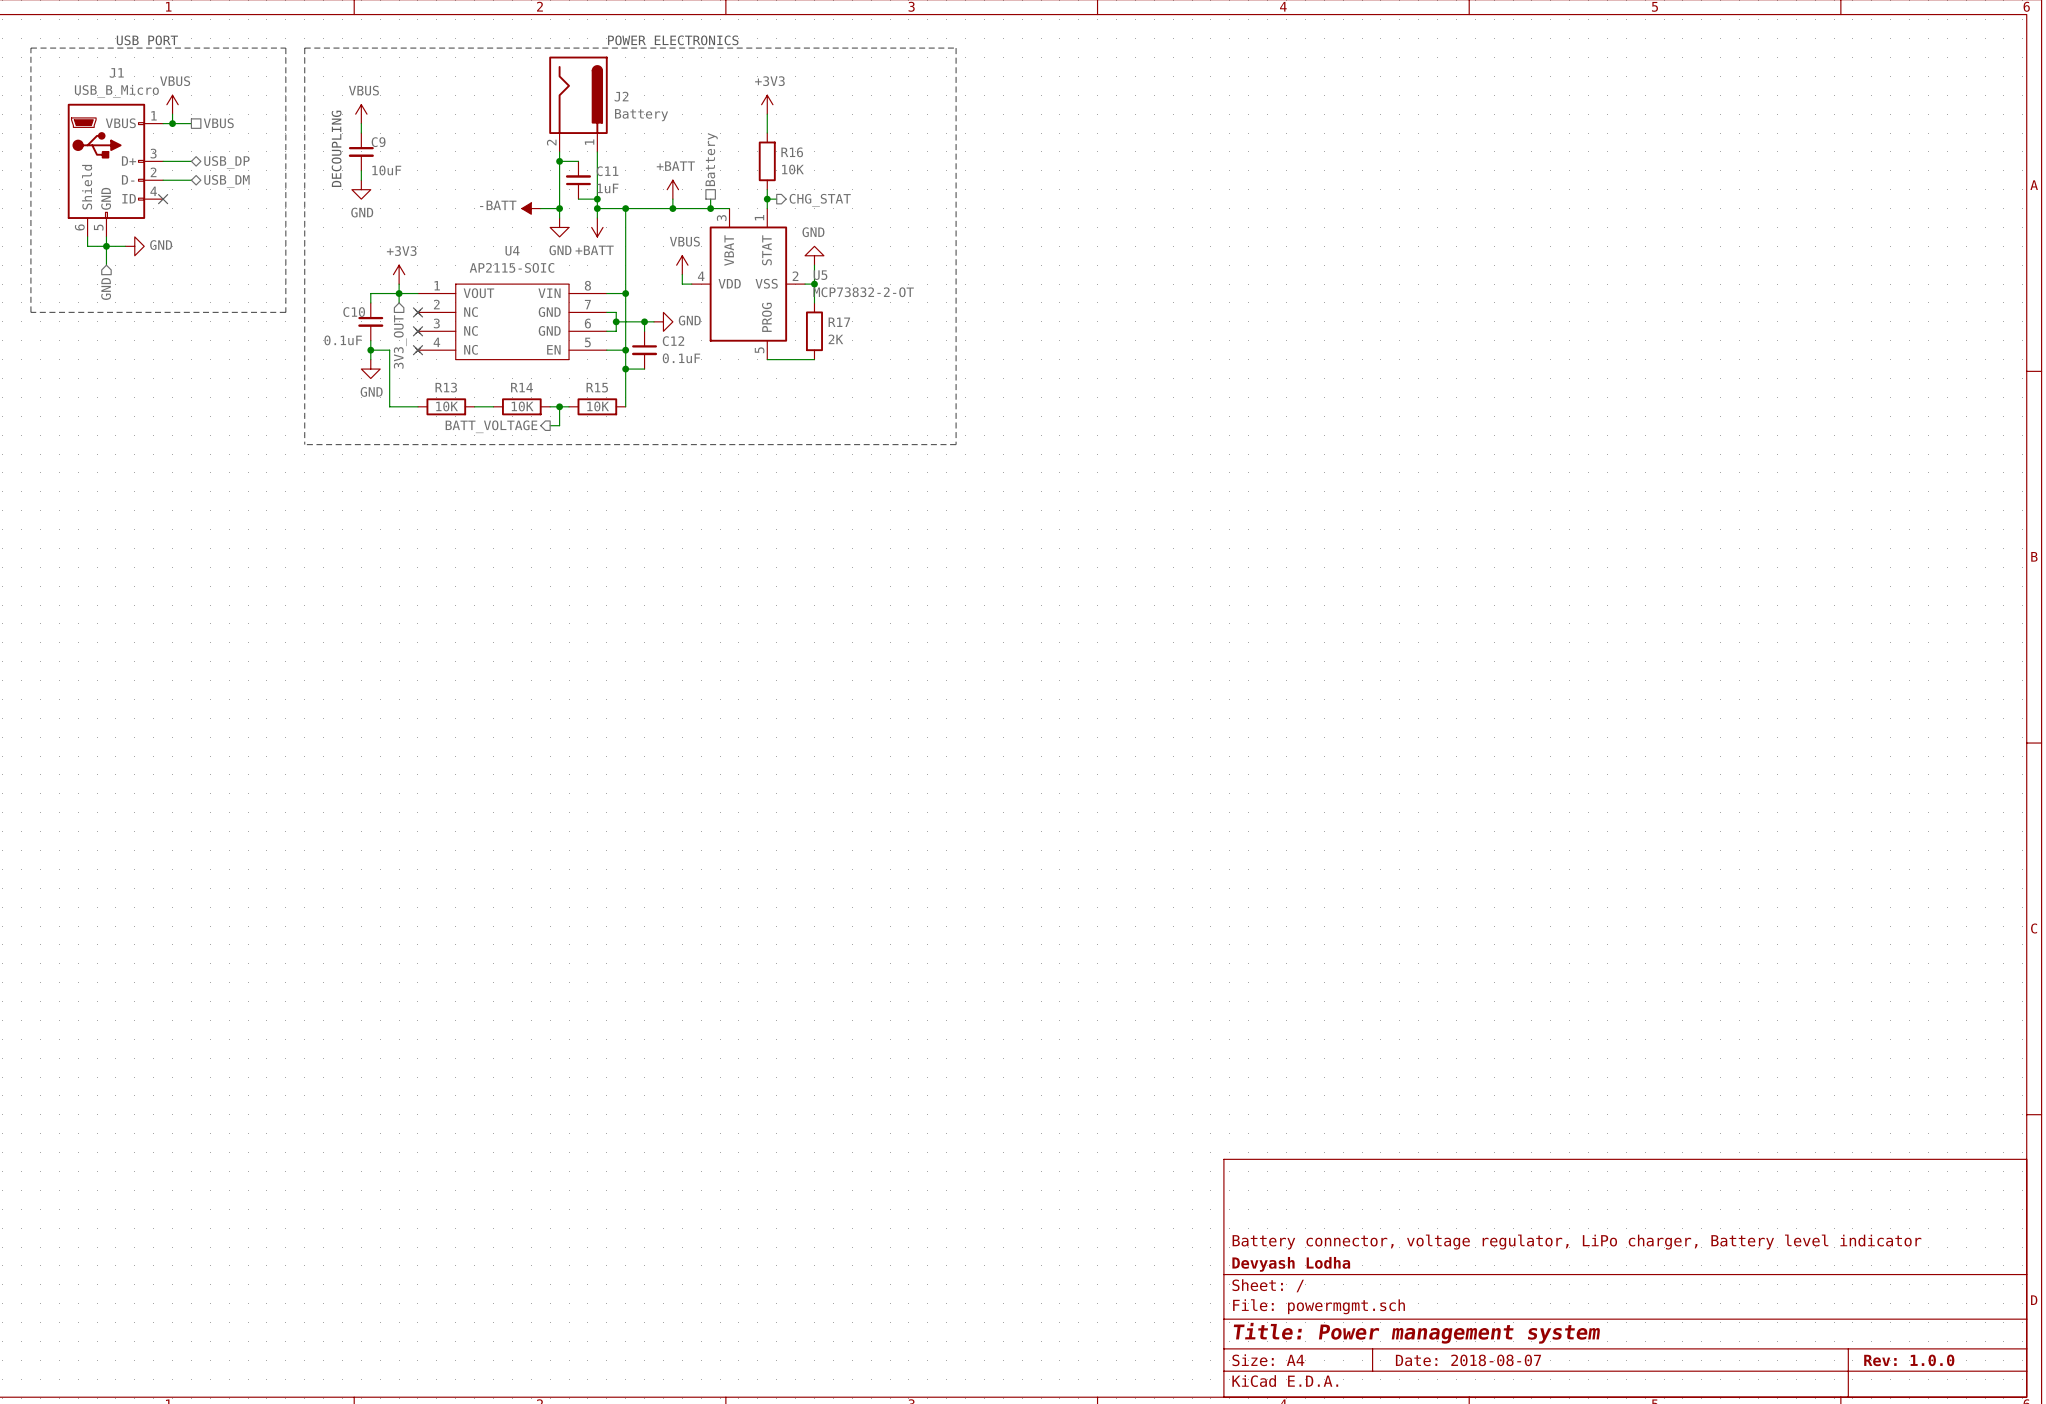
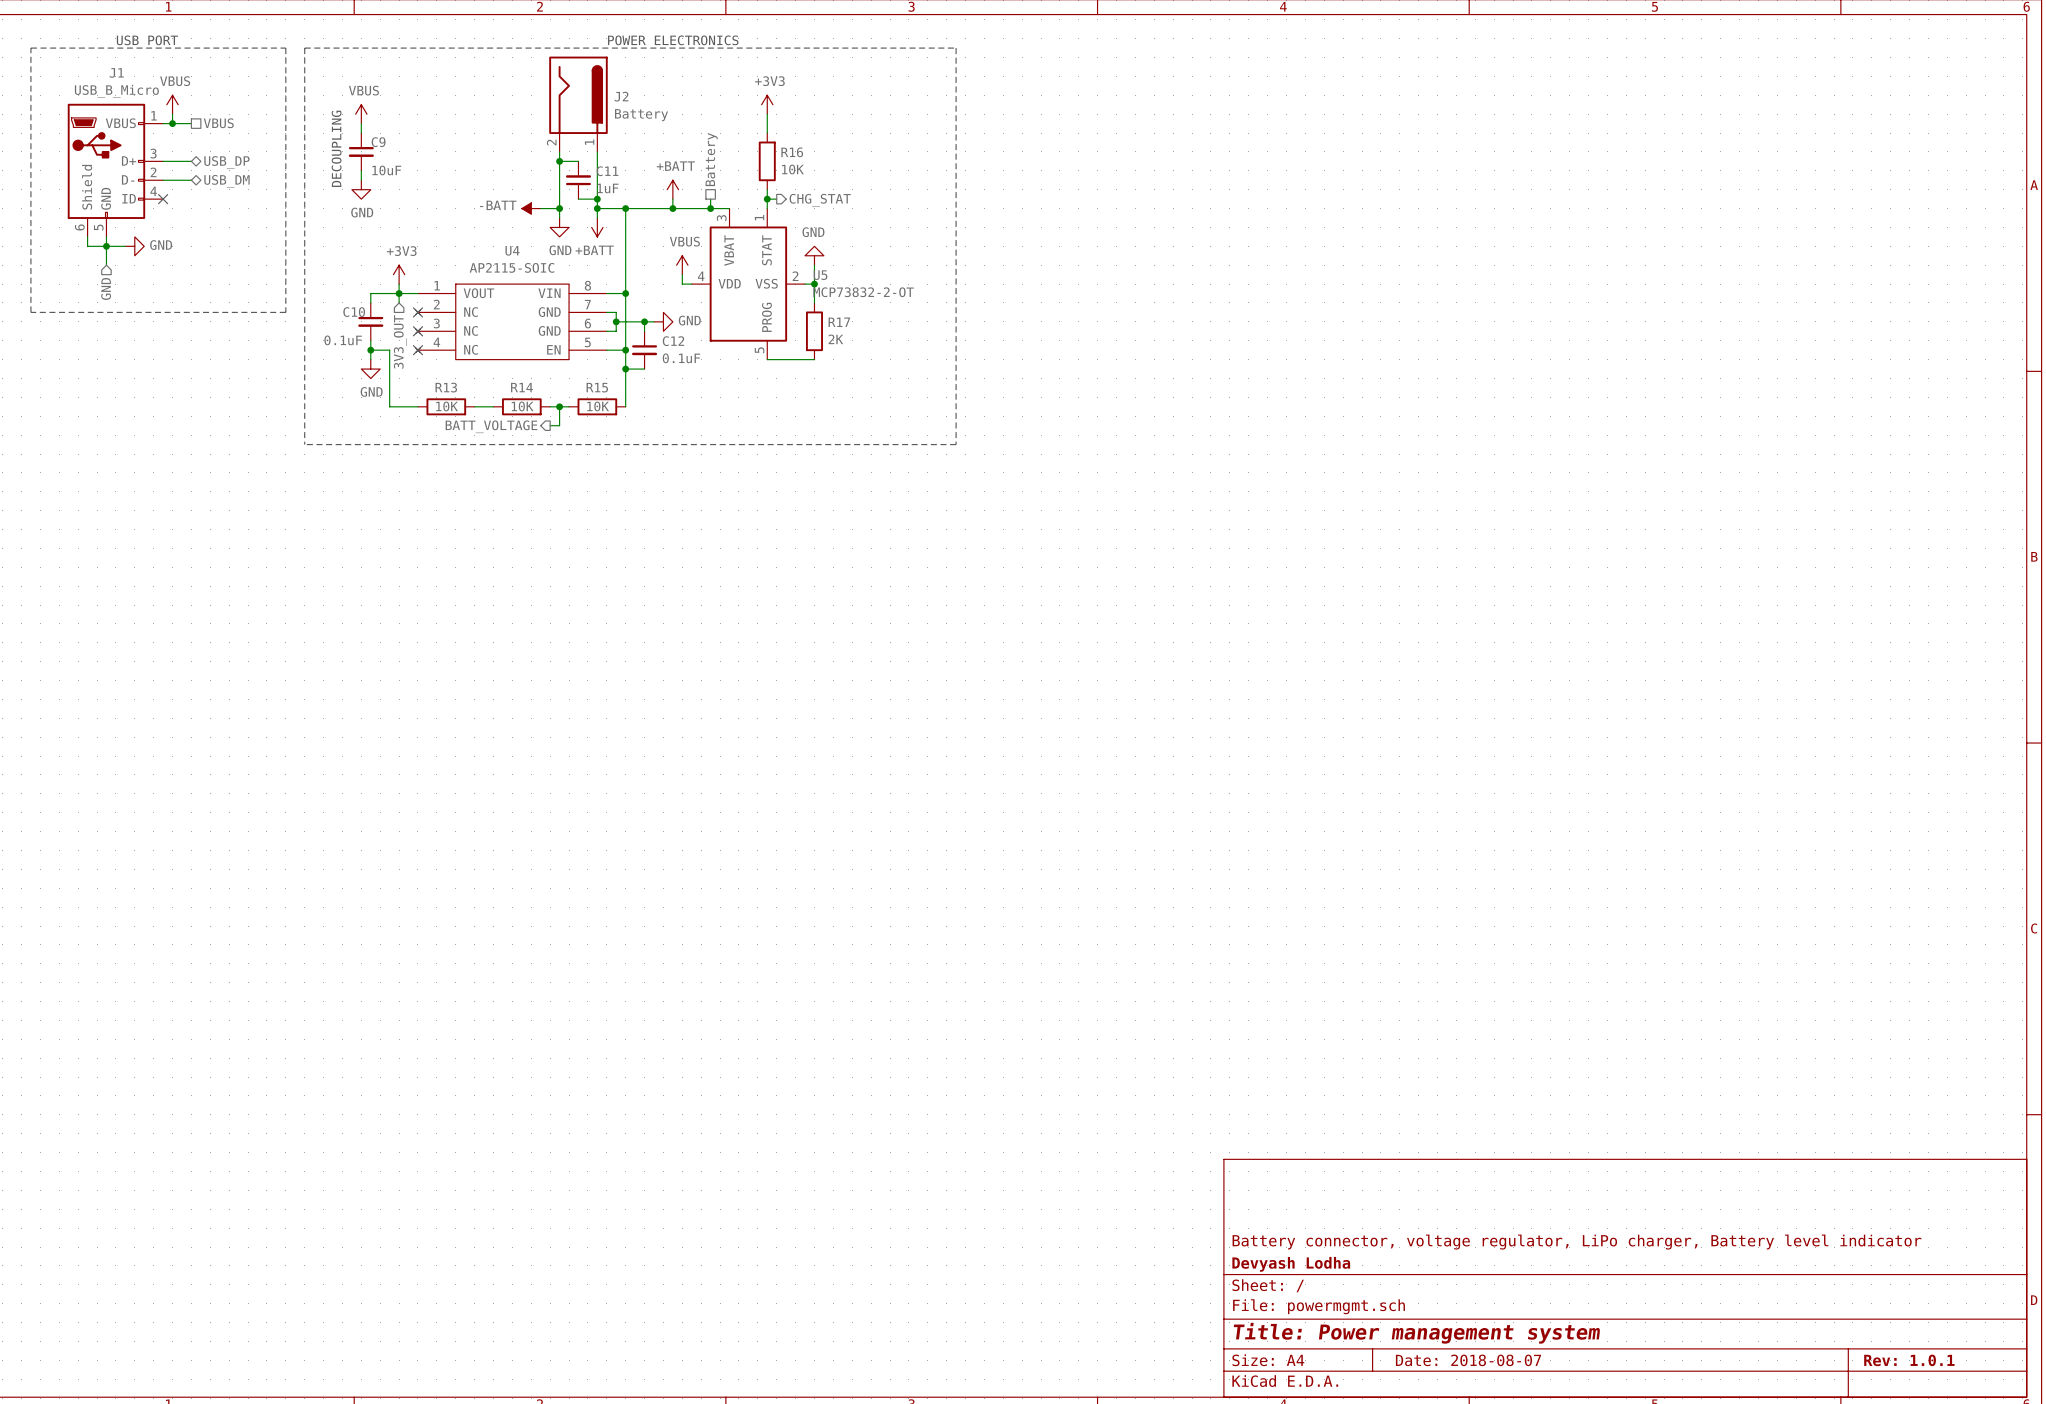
title block: Rev: 1.0.0 (1909, 1360) -> Rev: 1.0.1 (1909, 1360)

